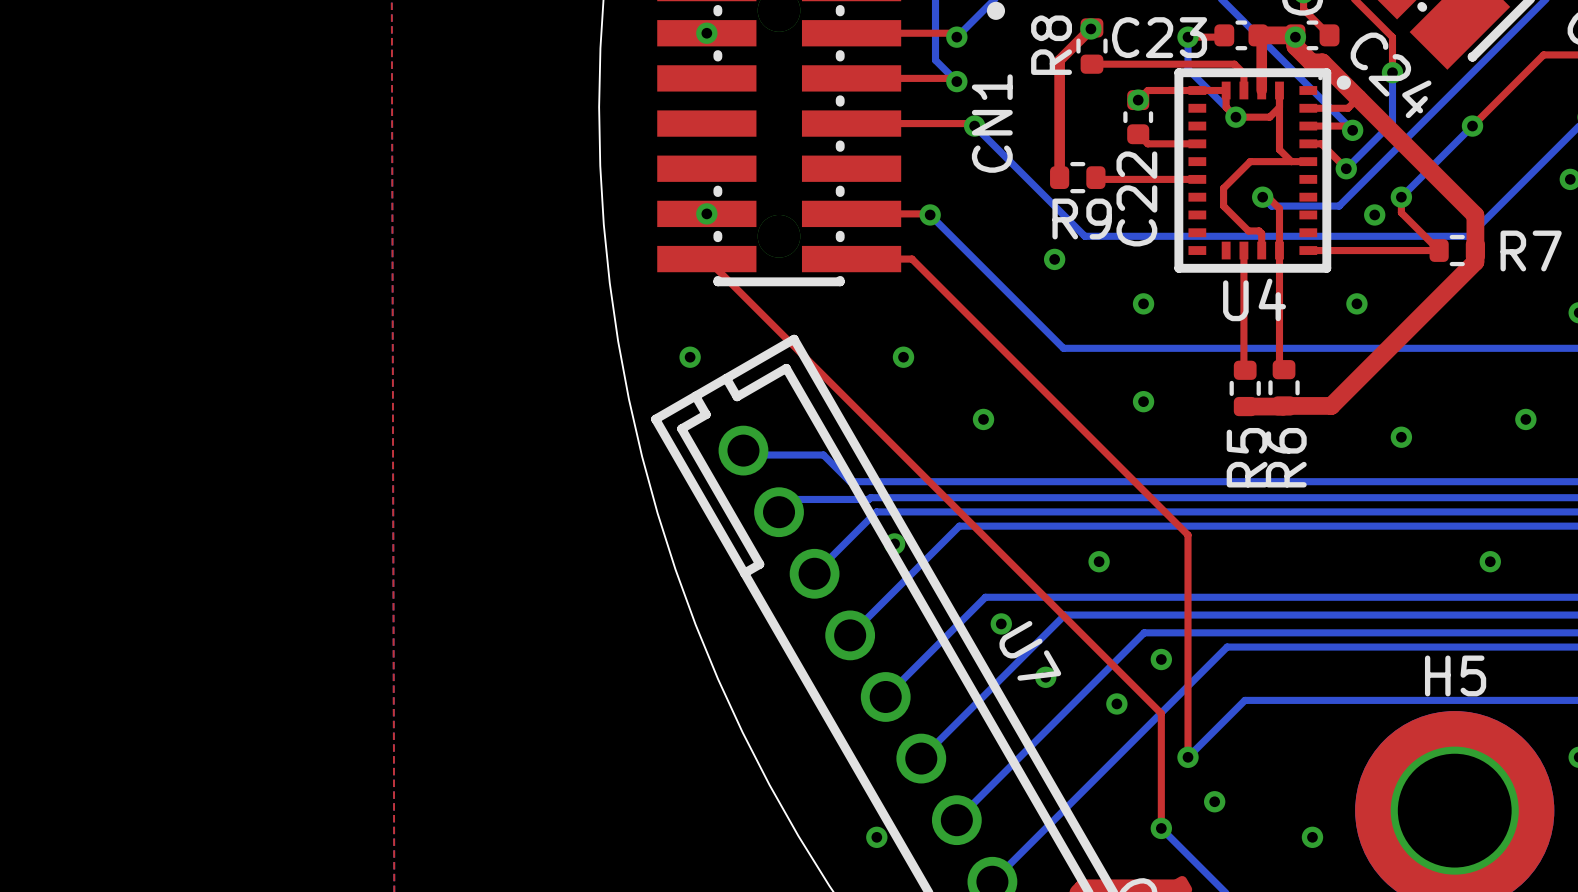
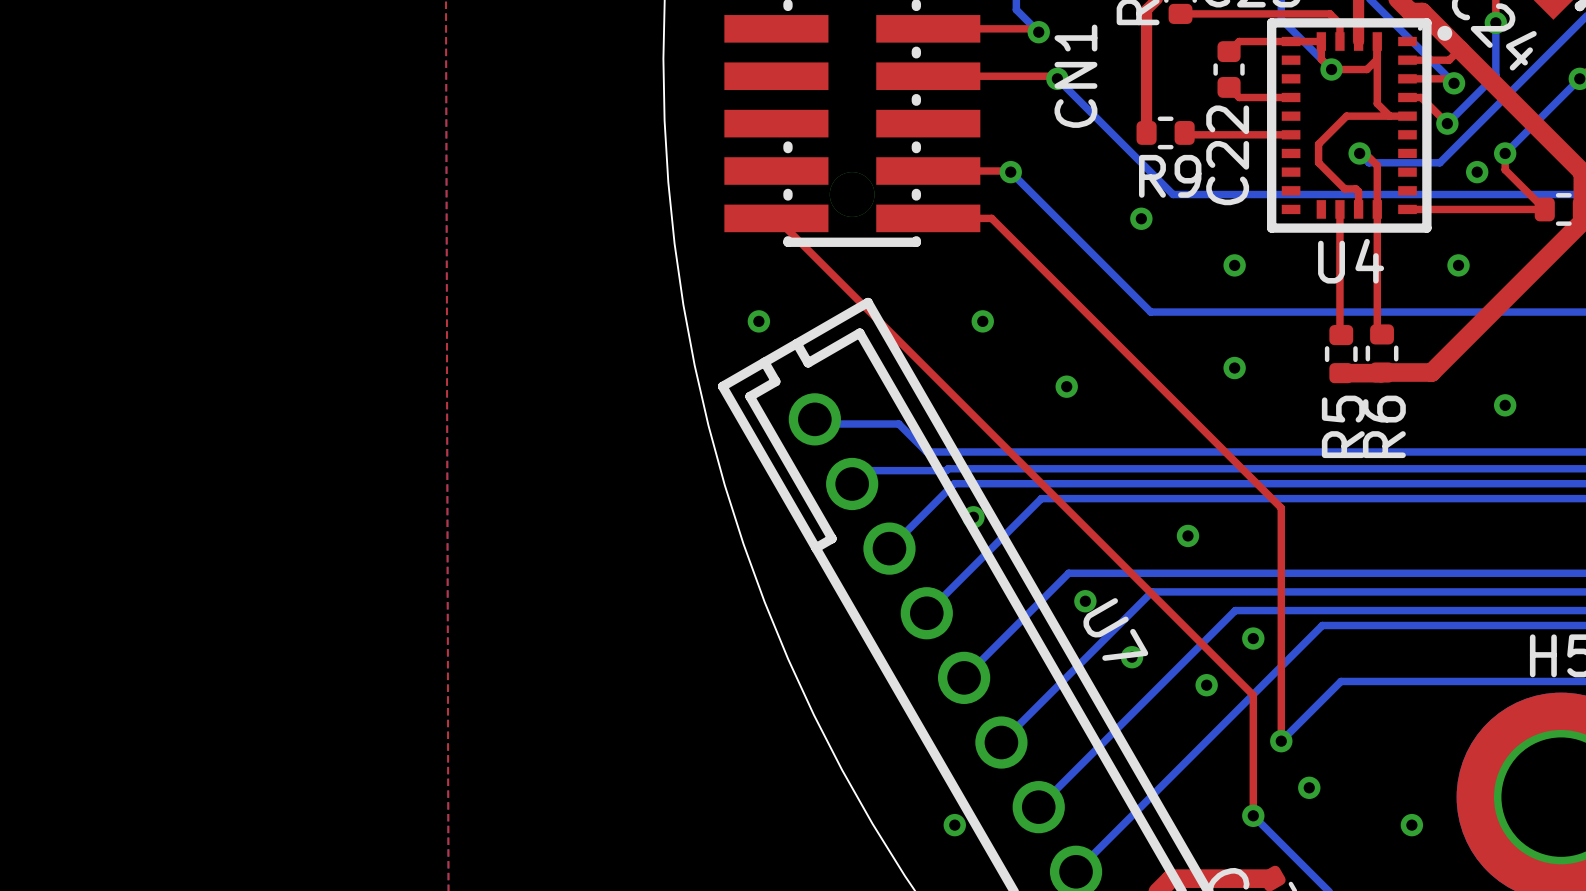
via: (1138, 100) -> none
via: (706, 213) -> none

